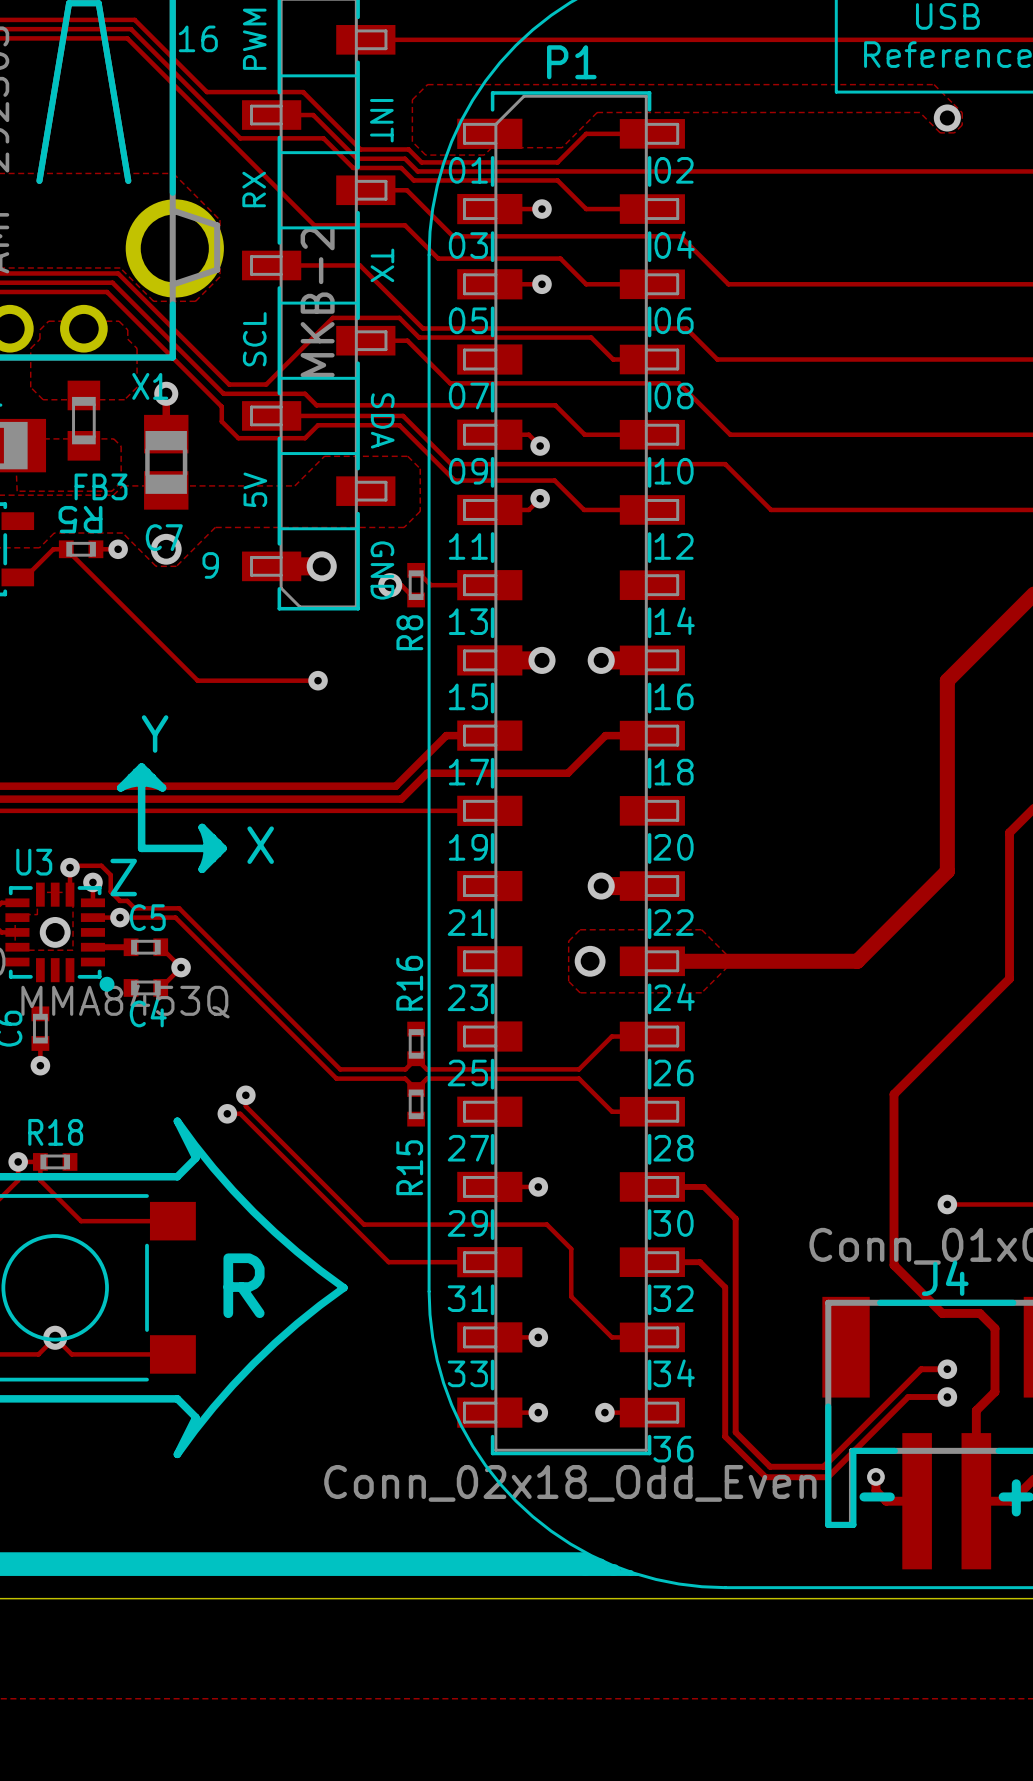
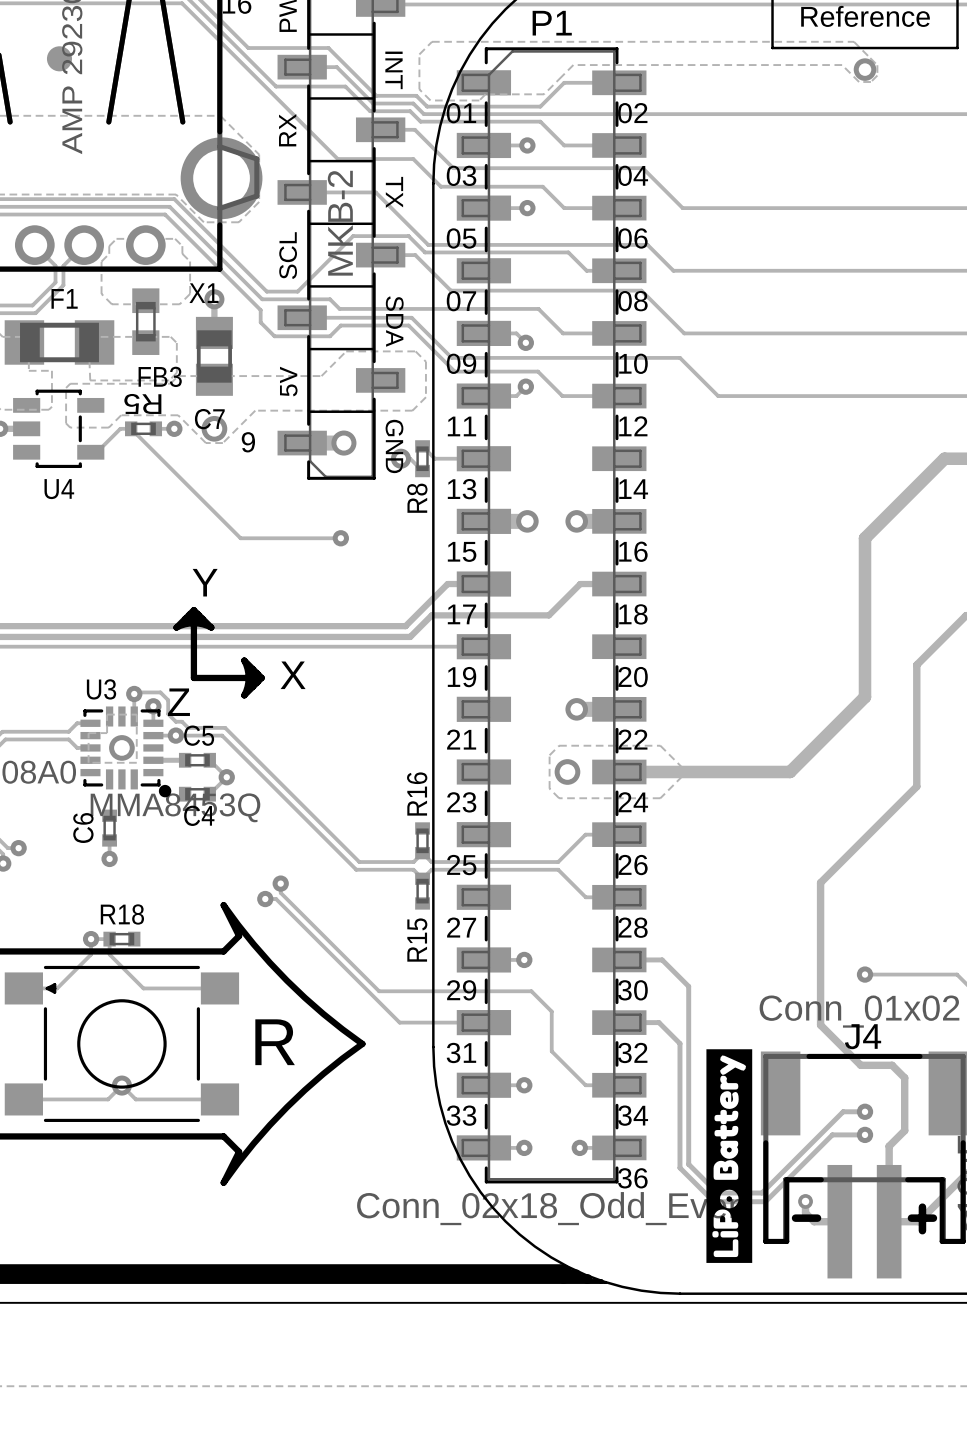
drawing: none -> [706, 1049, 753, 1263]

